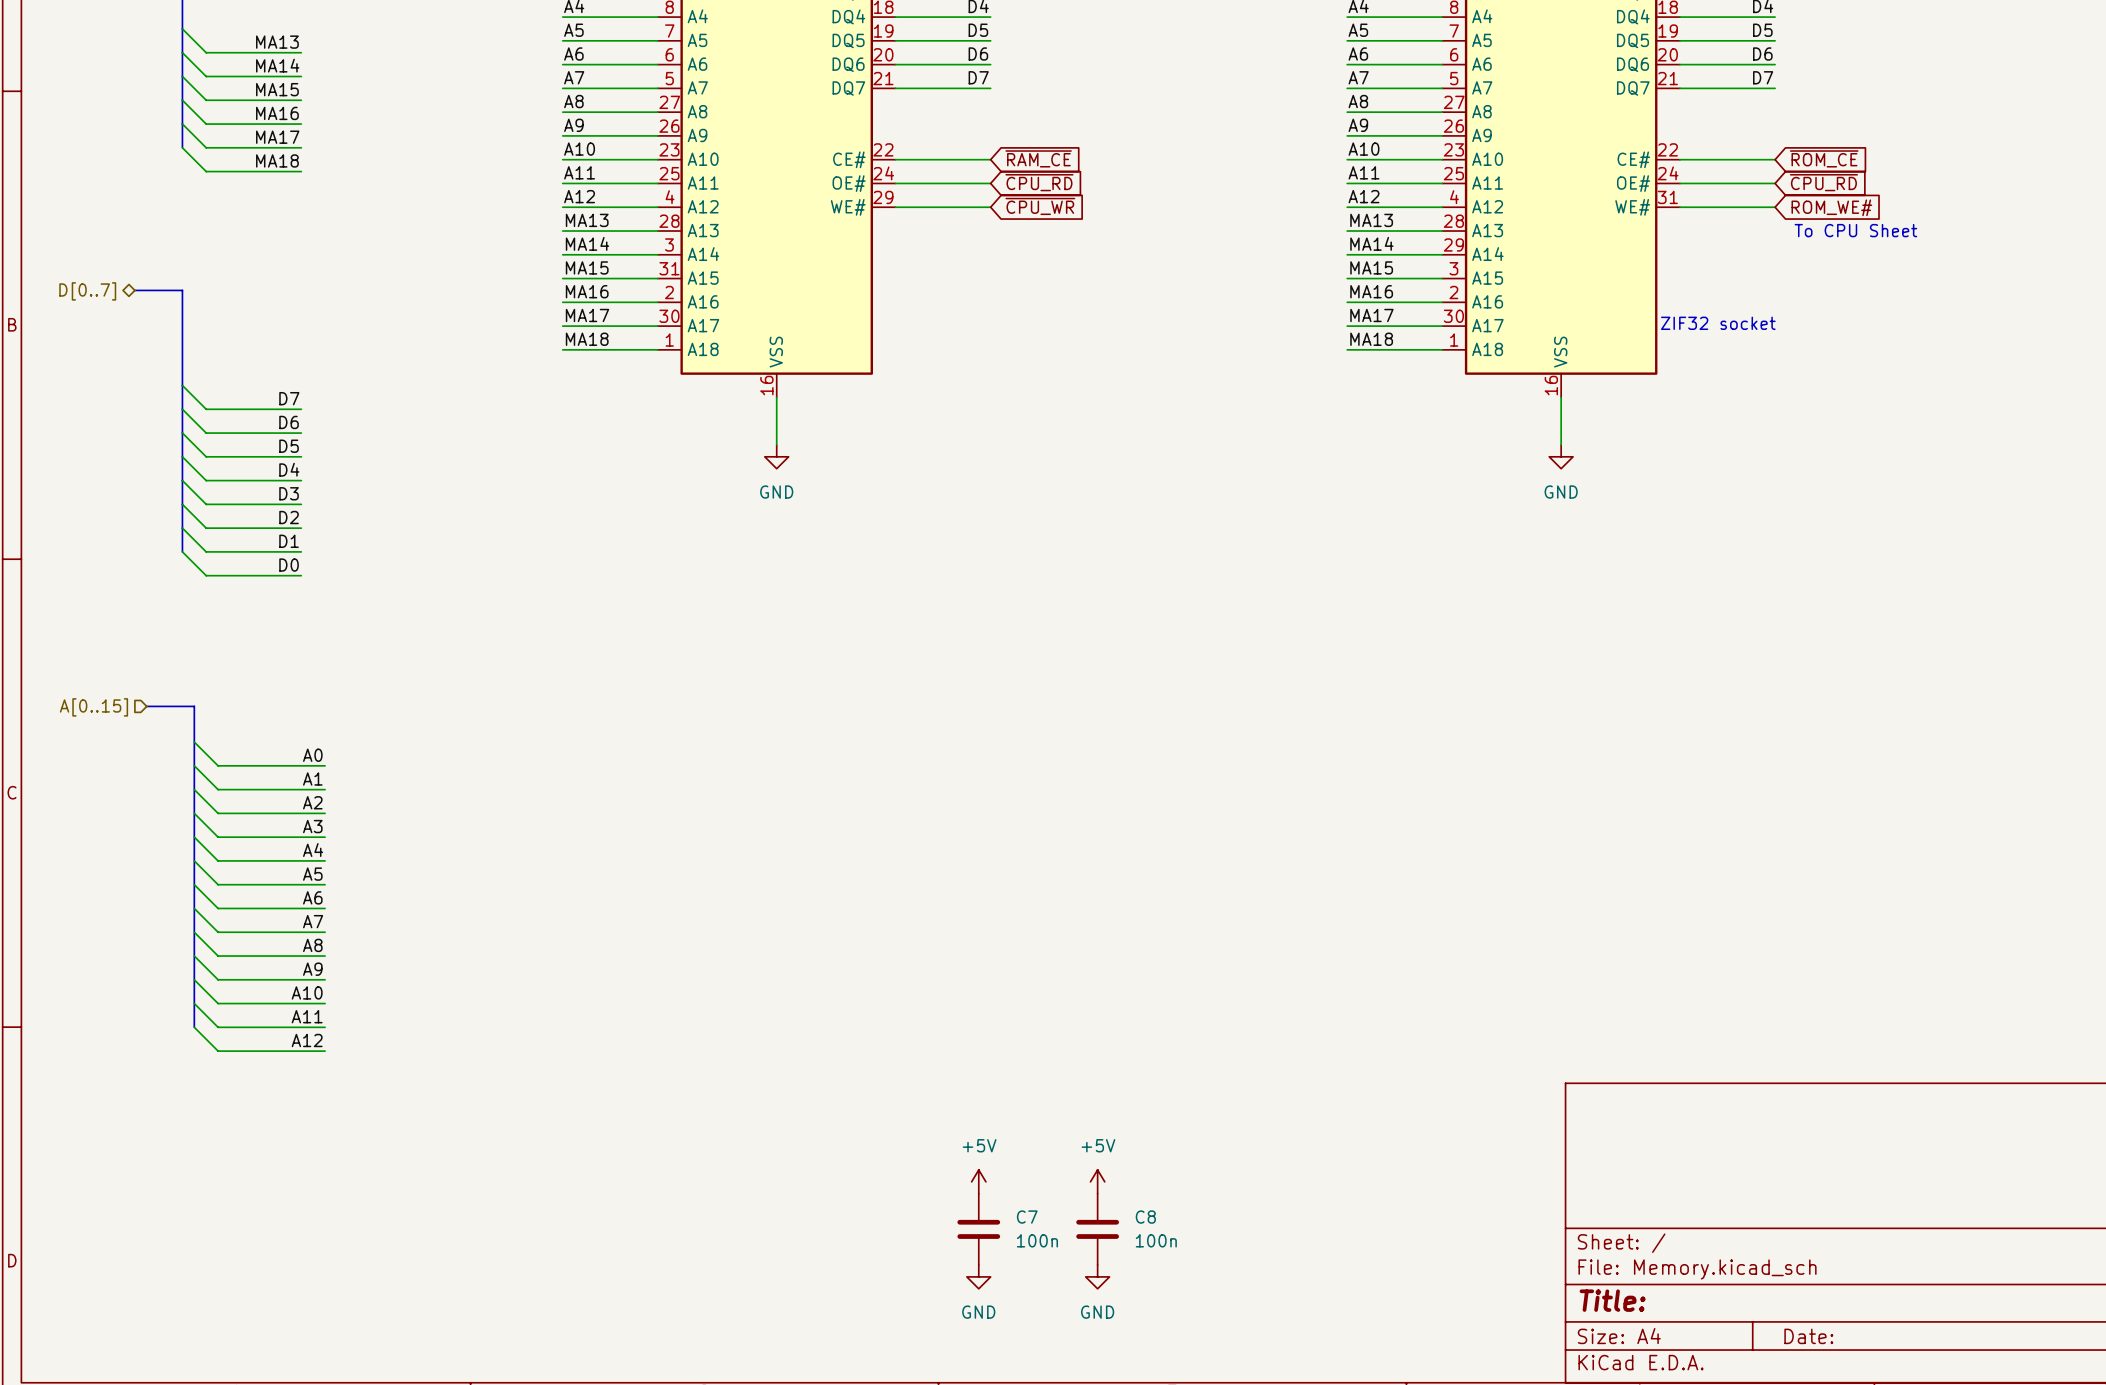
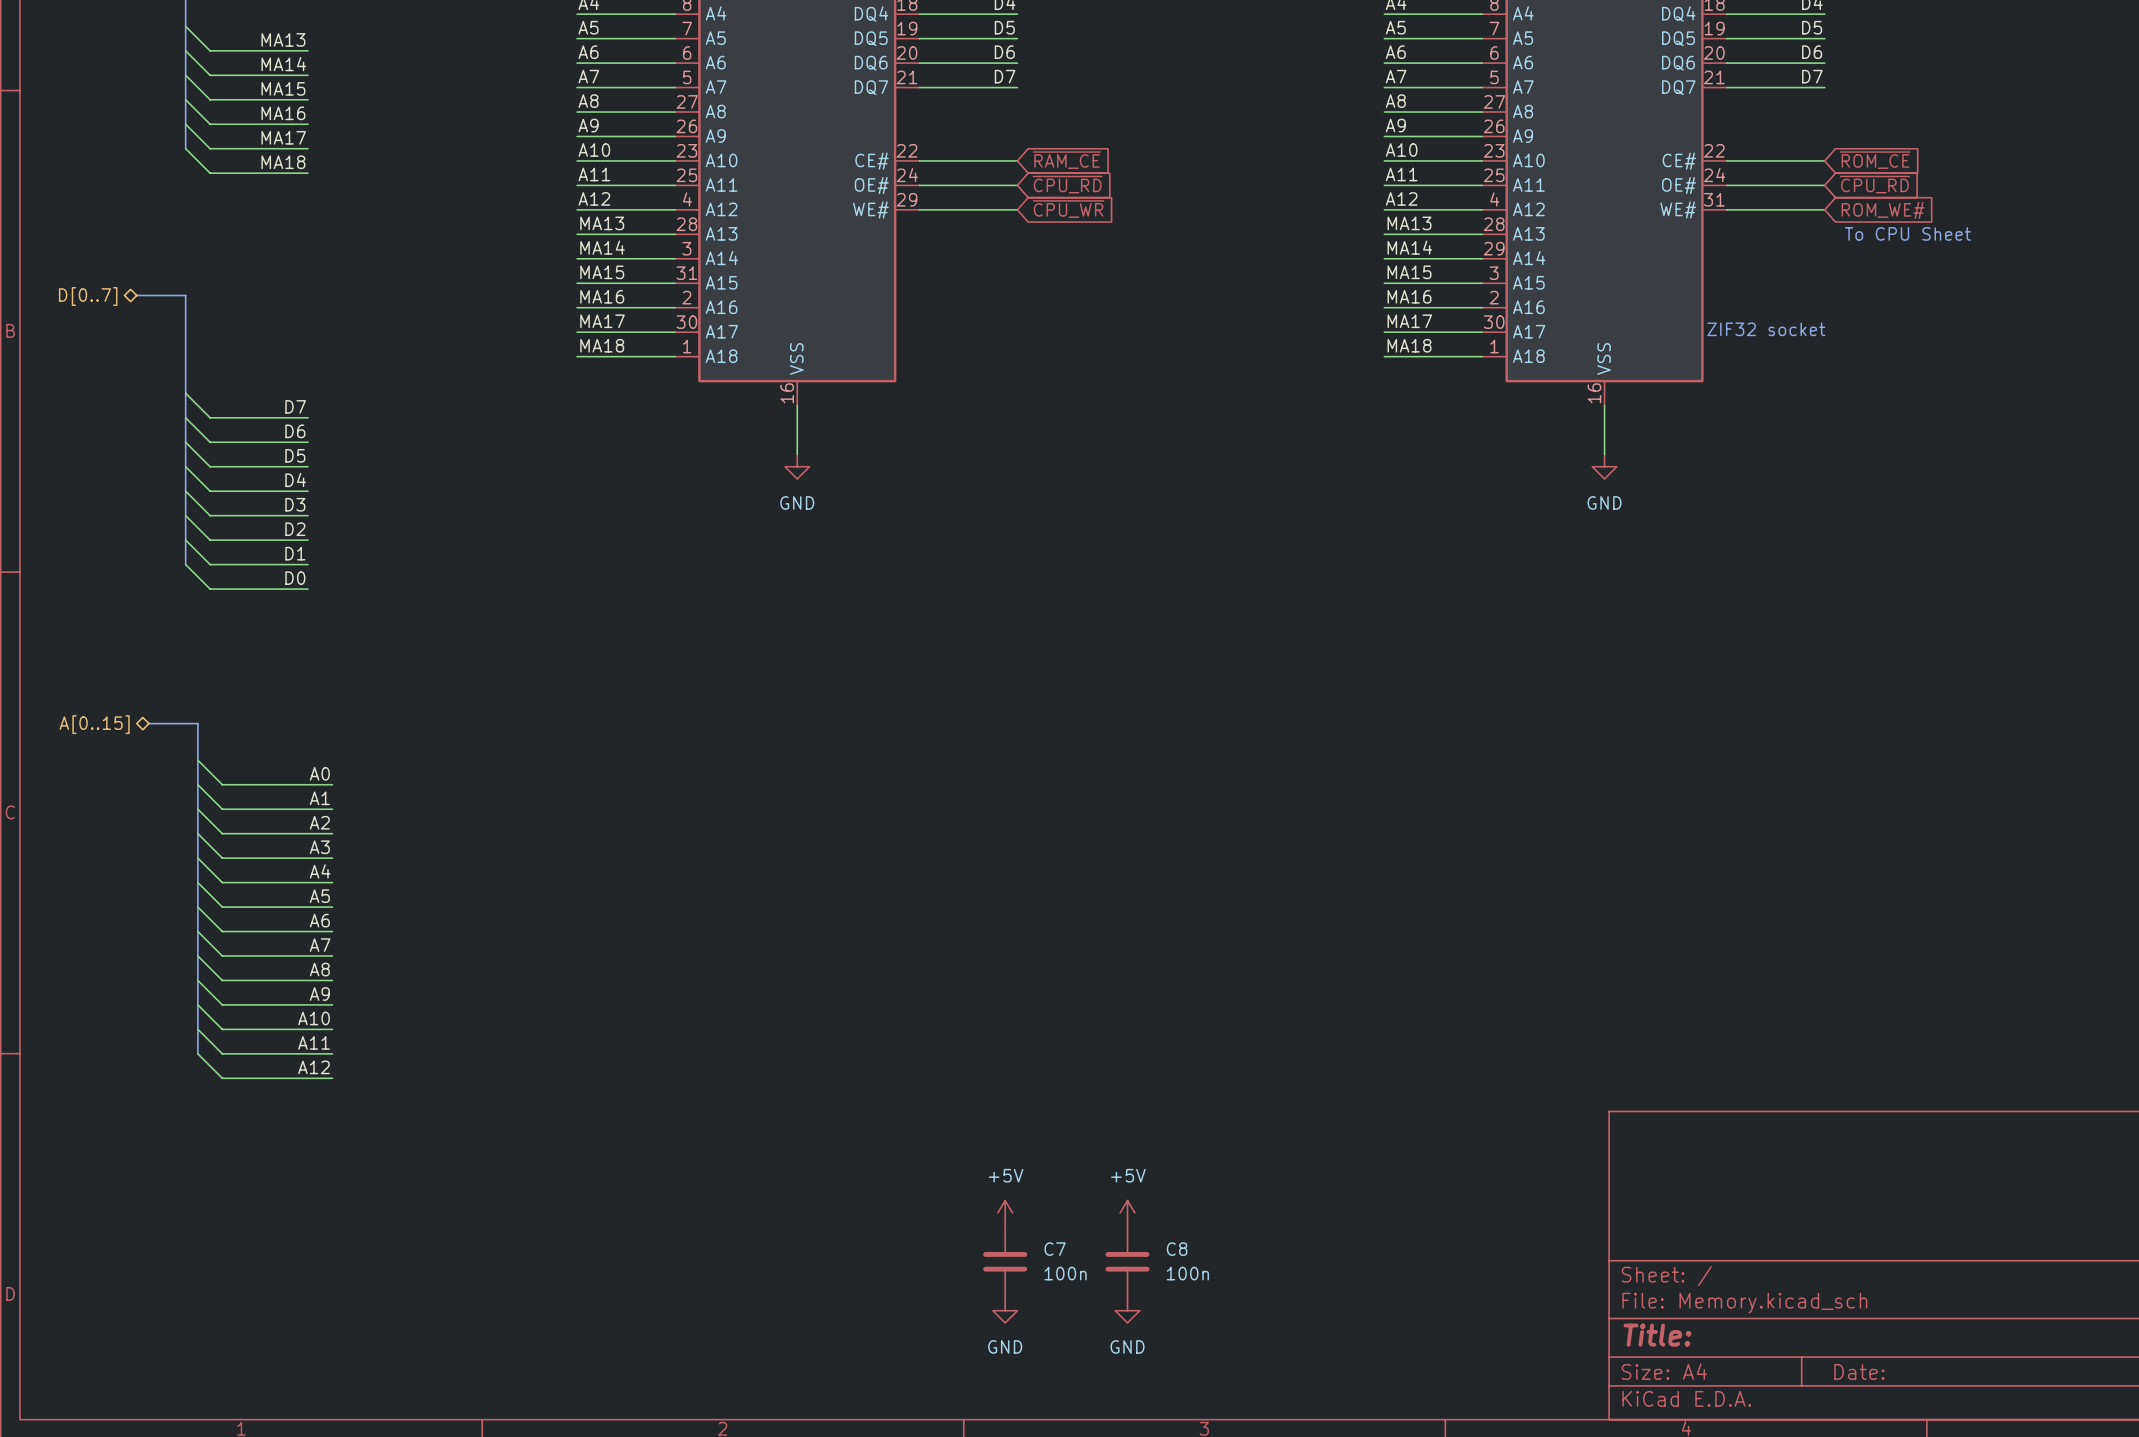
hierarchical label shape: input (93, 707) -> bidirectional (94, 724)

